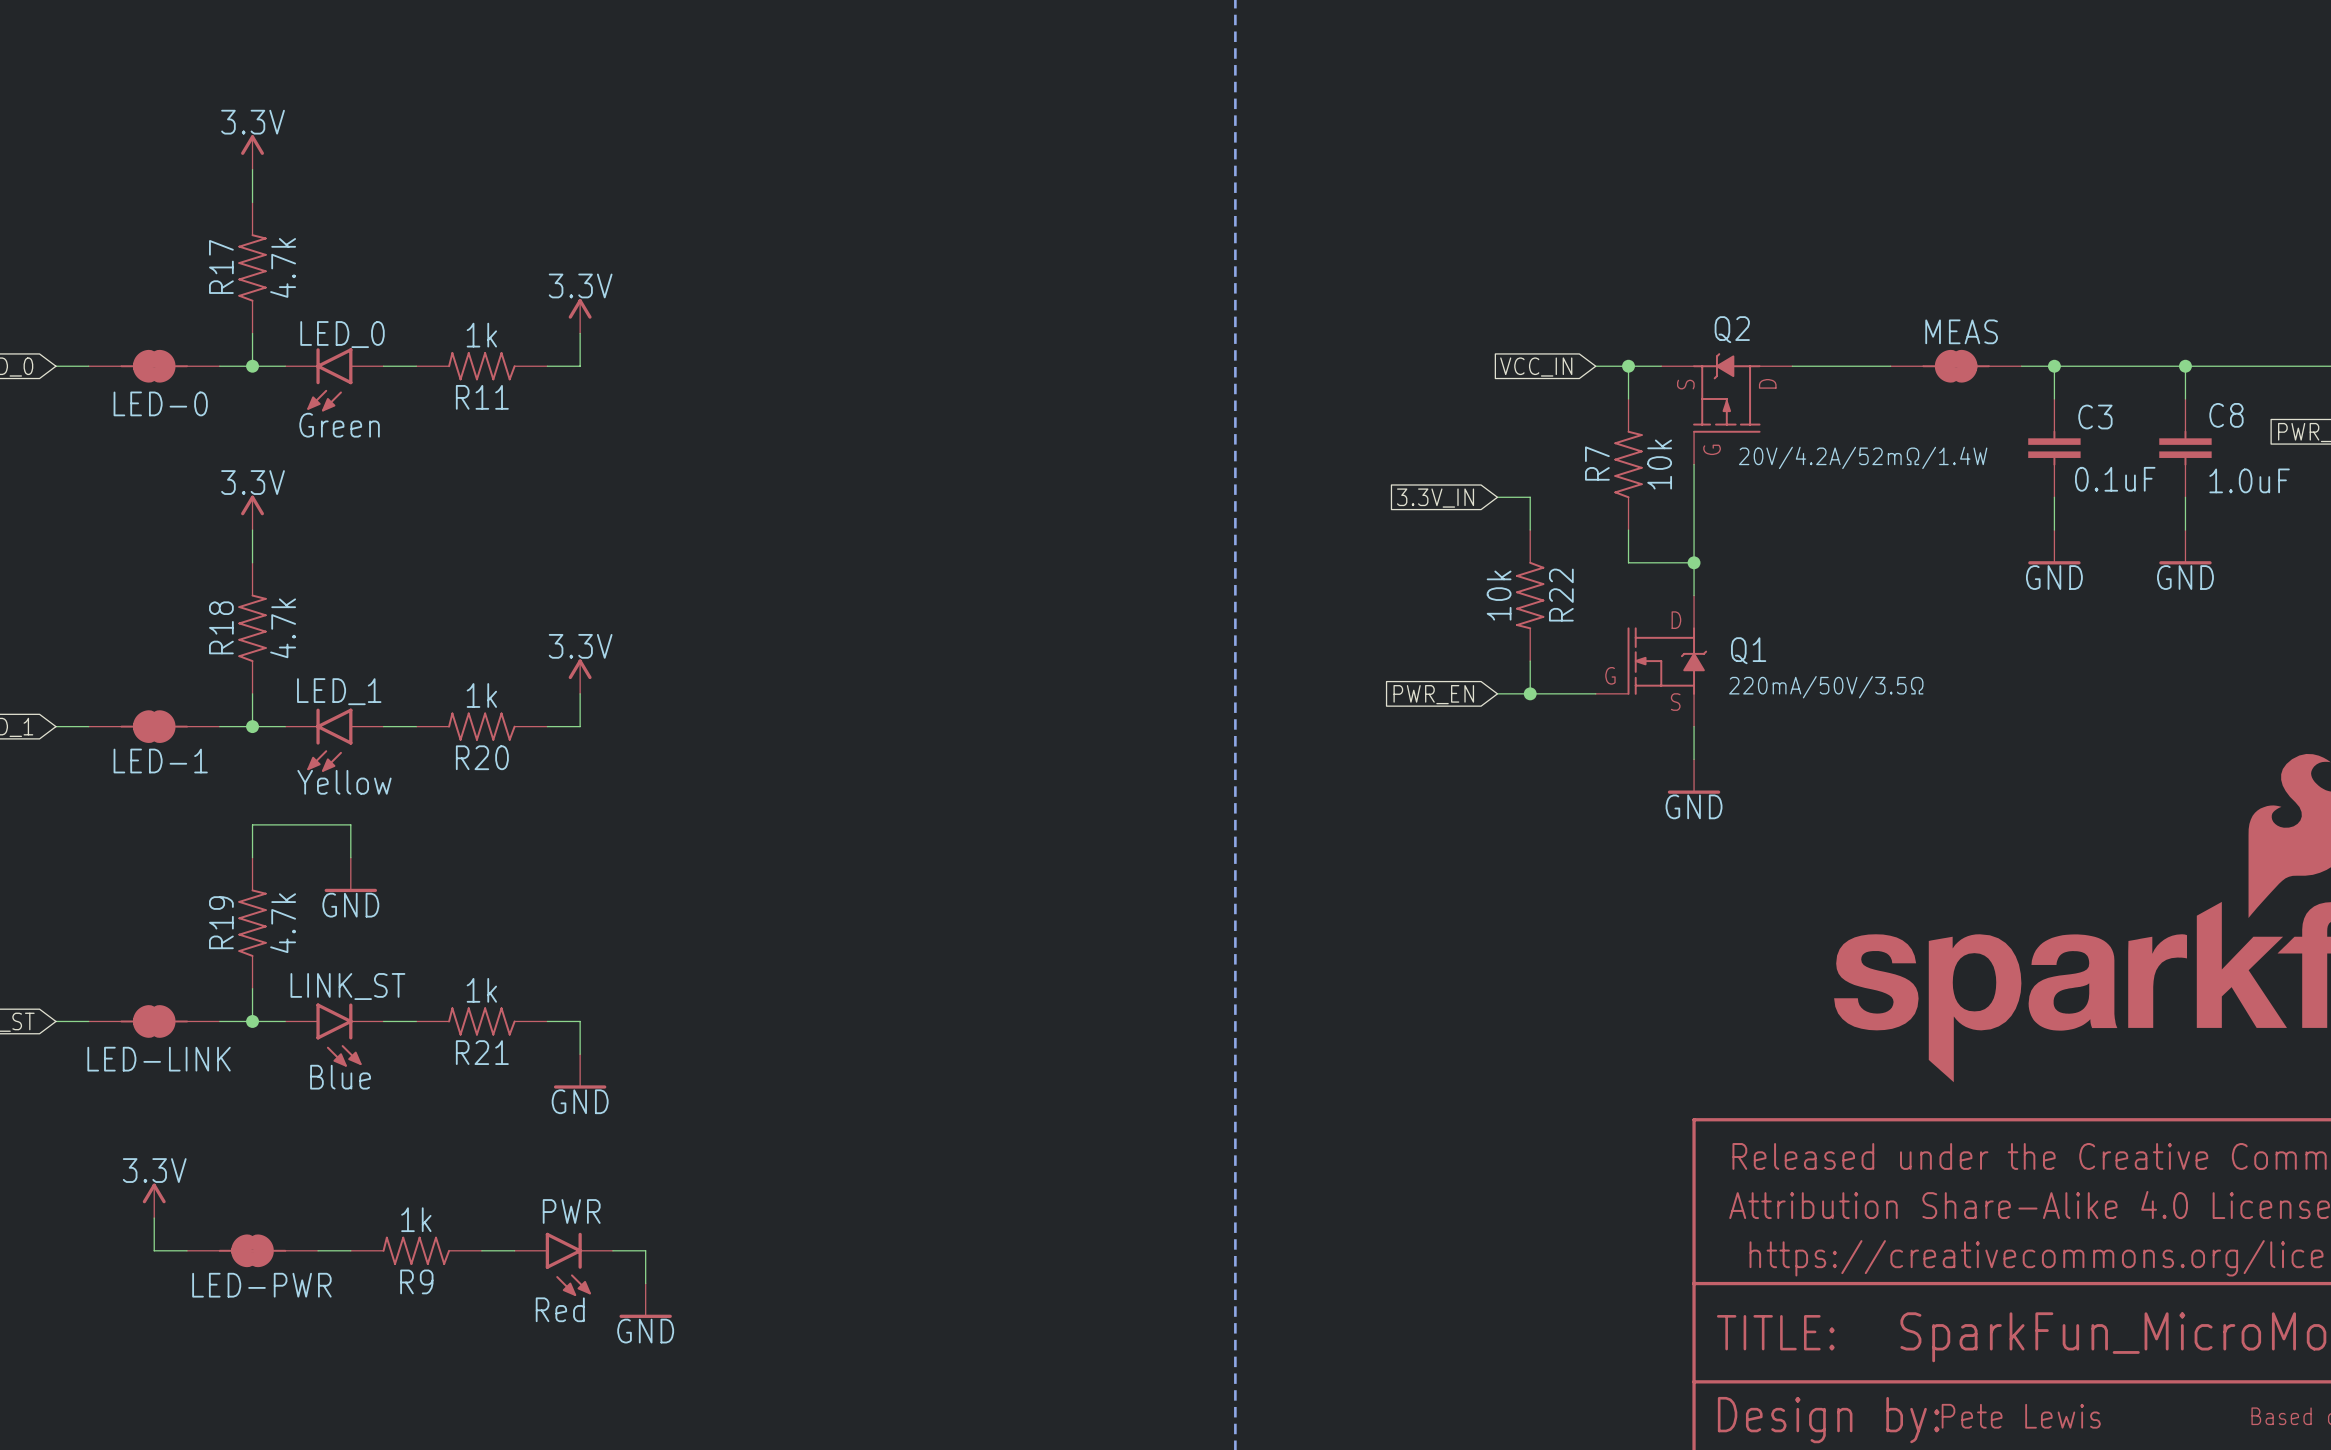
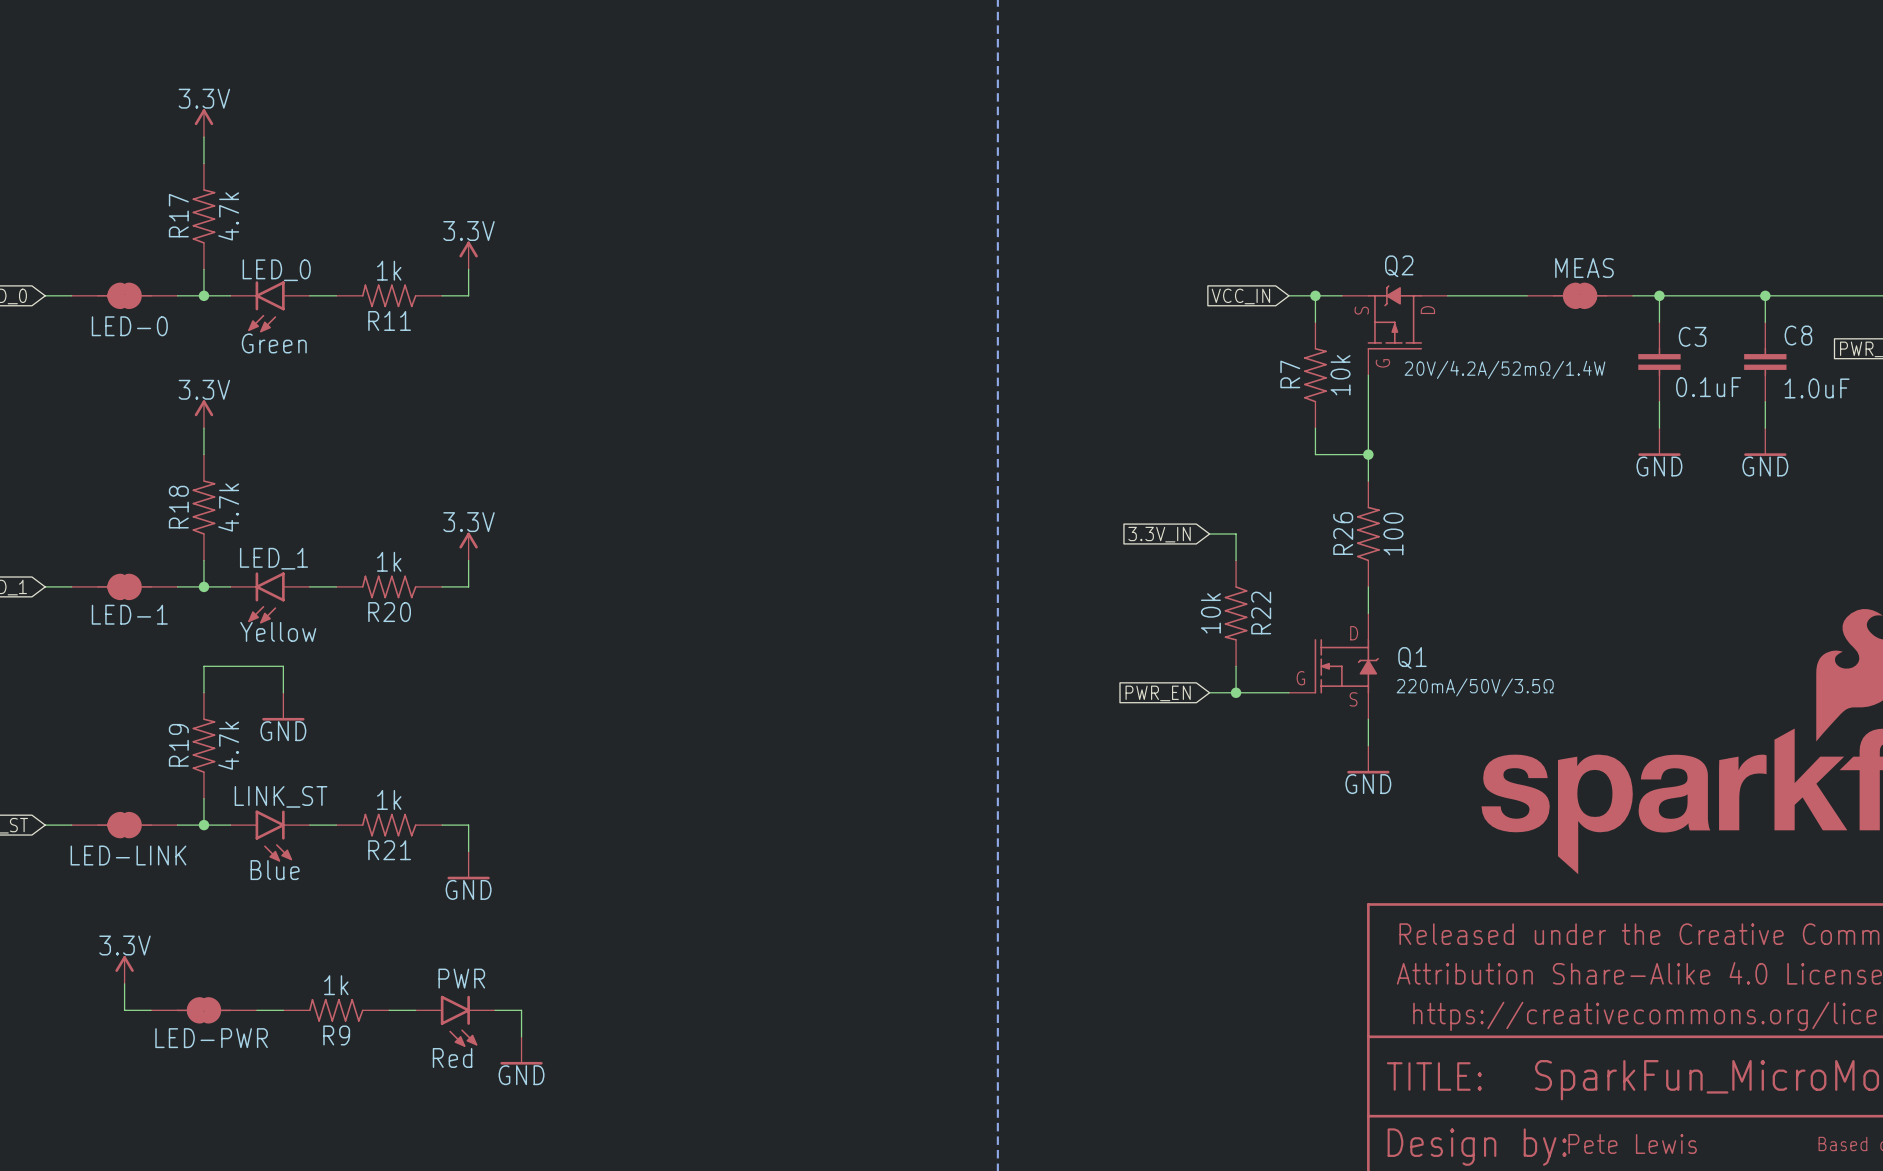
wire: (1497, 497) (1530, 497) (1530, 530) -> none
global label position: 3.3V_IN (1435, 498) -> 3.3V_IN (1159, 534)
R22 position: (1530, 595) -> (1236, 613)
wire: none -> (1209, 534) (1236, 534)
Q1 position: (1651, 661) -> (1333, 666)
R26: none -> 100 (1368, 534)
wire: (1497, 693) (1595, 693) -> (1209, 692) (1288, 692)
junction: (1530, 693) -> none
global label position: PWR_EN (1433, 694) -> PWR_EN (1158, 693)
power symbol position: GND (1694, 776) -> GND (1368, 759)
wire: none -> (1236, 666) (1236, 692)
junction: none -> (1236, 692)
wire: none -> (1368, 719) (1368, 745)

